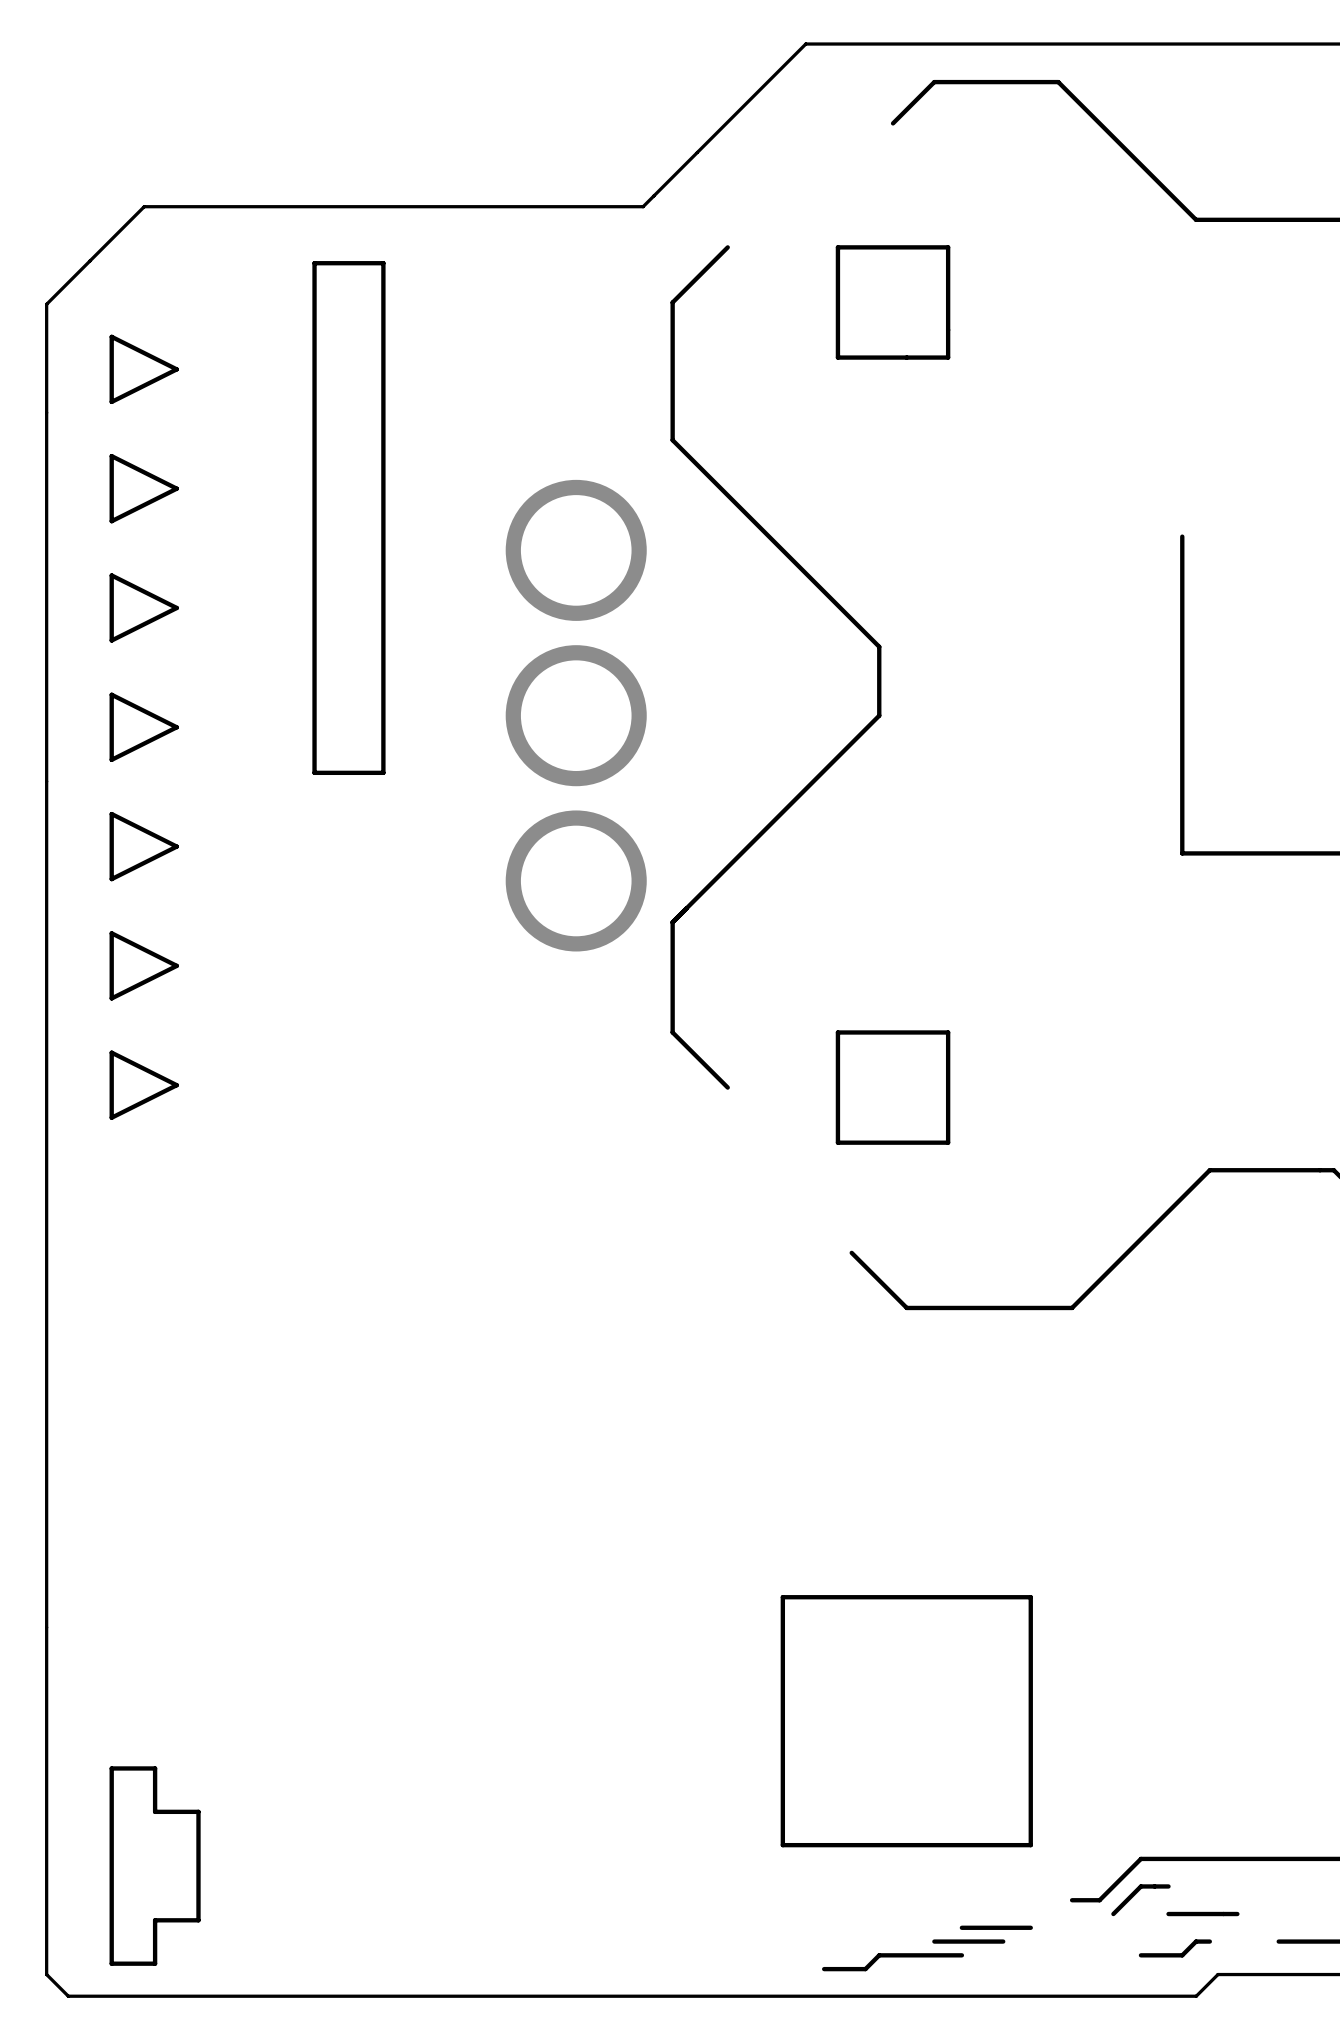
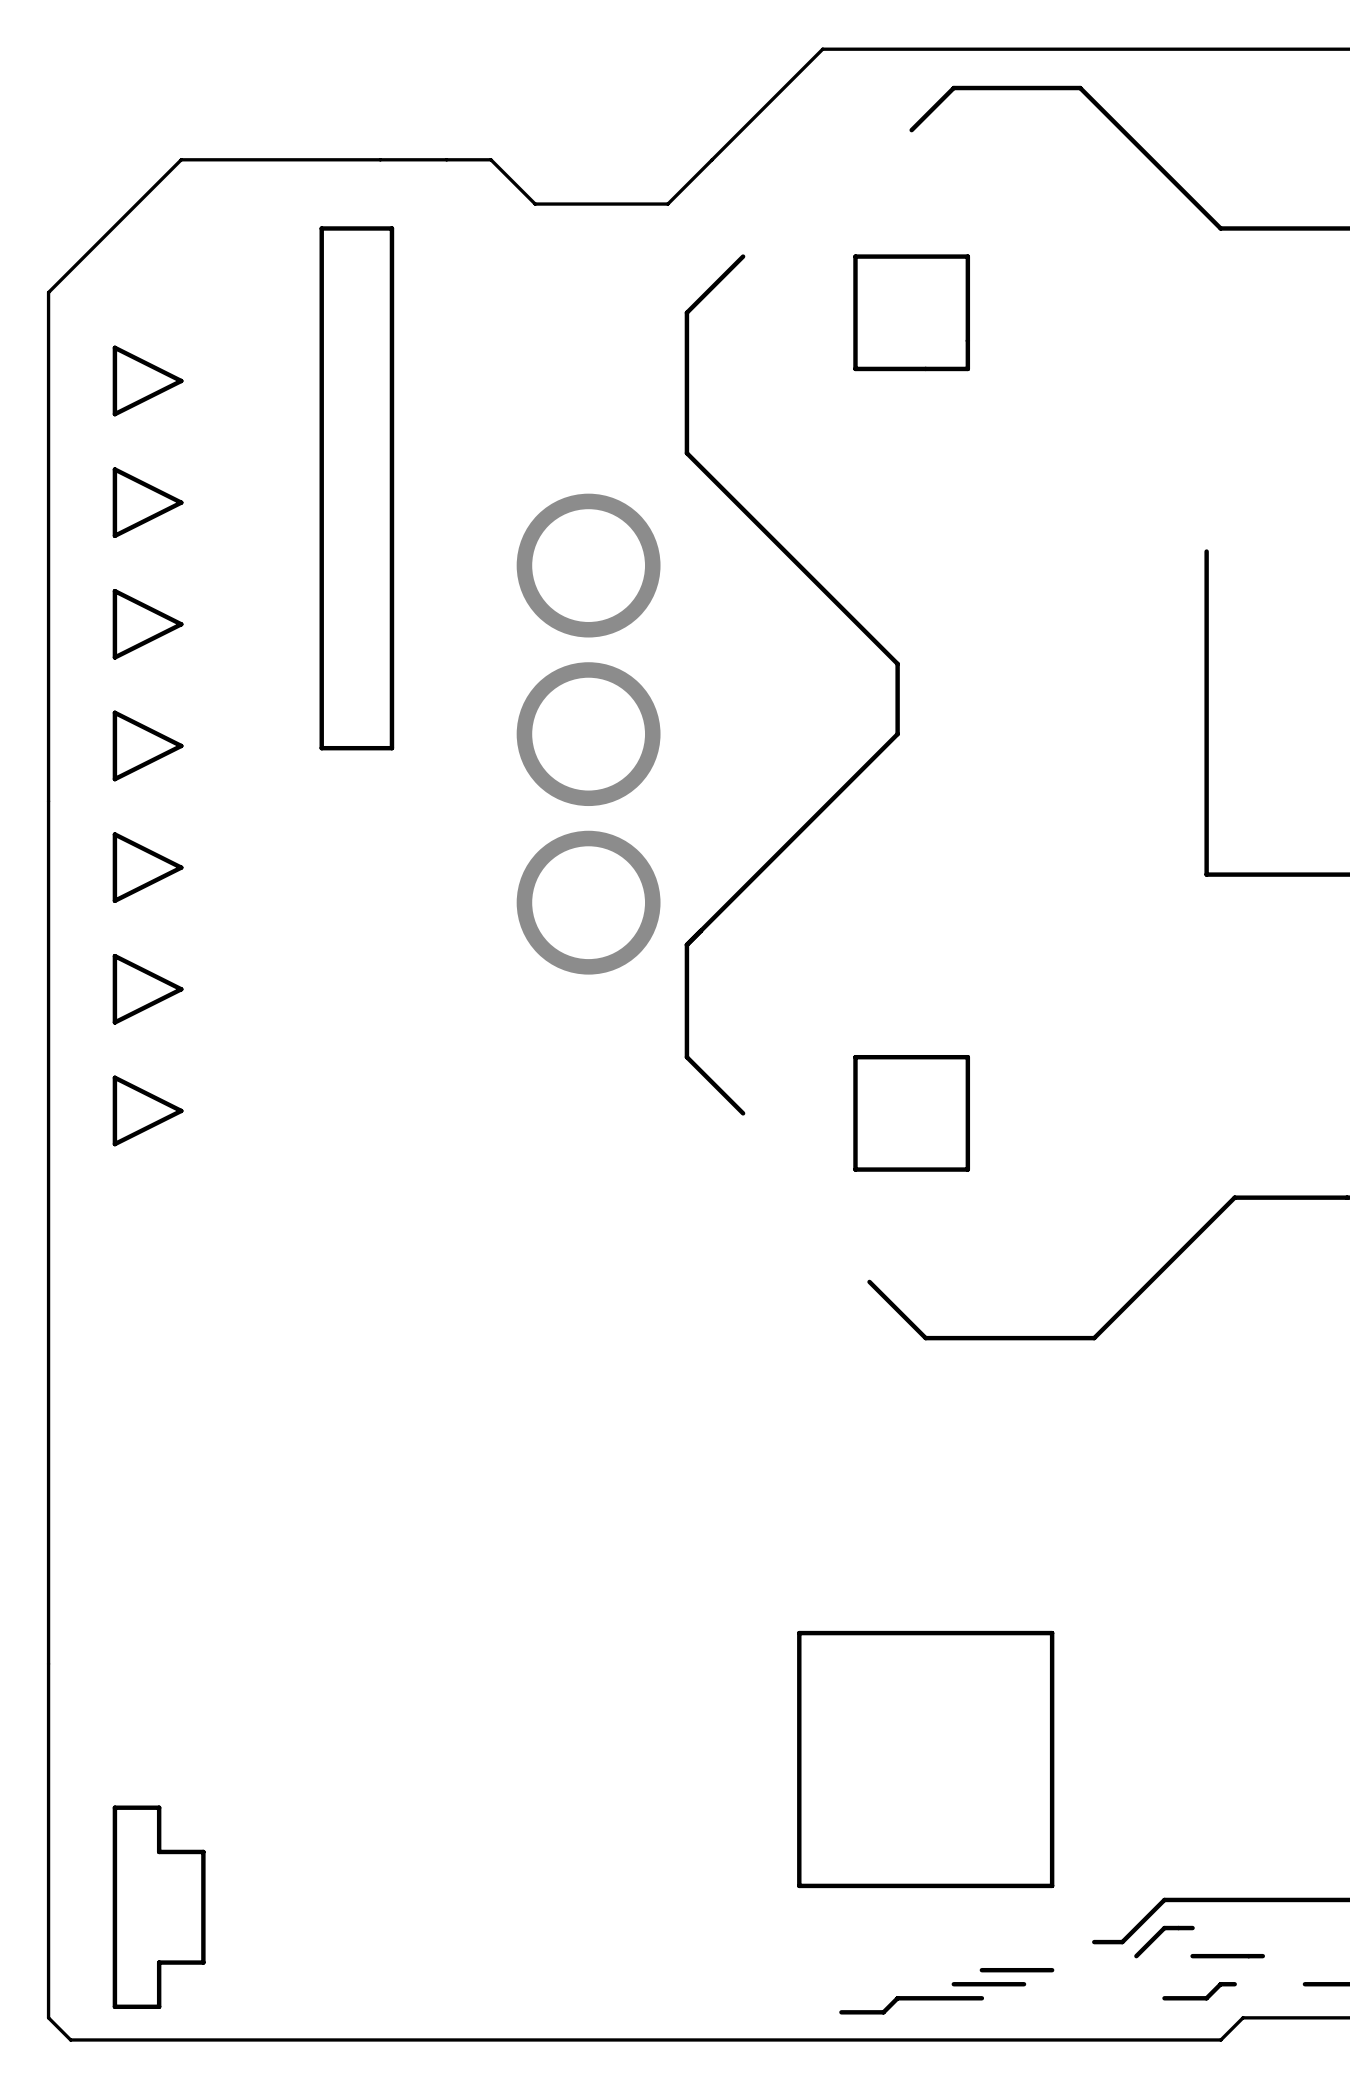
board edge: (654, 195) (643, 206) (144, 206) (46, 304) -> (667, 204) (535, 204) (490, 159) (181, 159) (48, 292) (48, 314)
line: (383, 263) (314, 263) -> (391, 272) (391, 228) (321, 228) (321, 272)
line: (383, 729) (383, 772) (314, 772) (314, 729) -> (391, 748) (321, 748)

